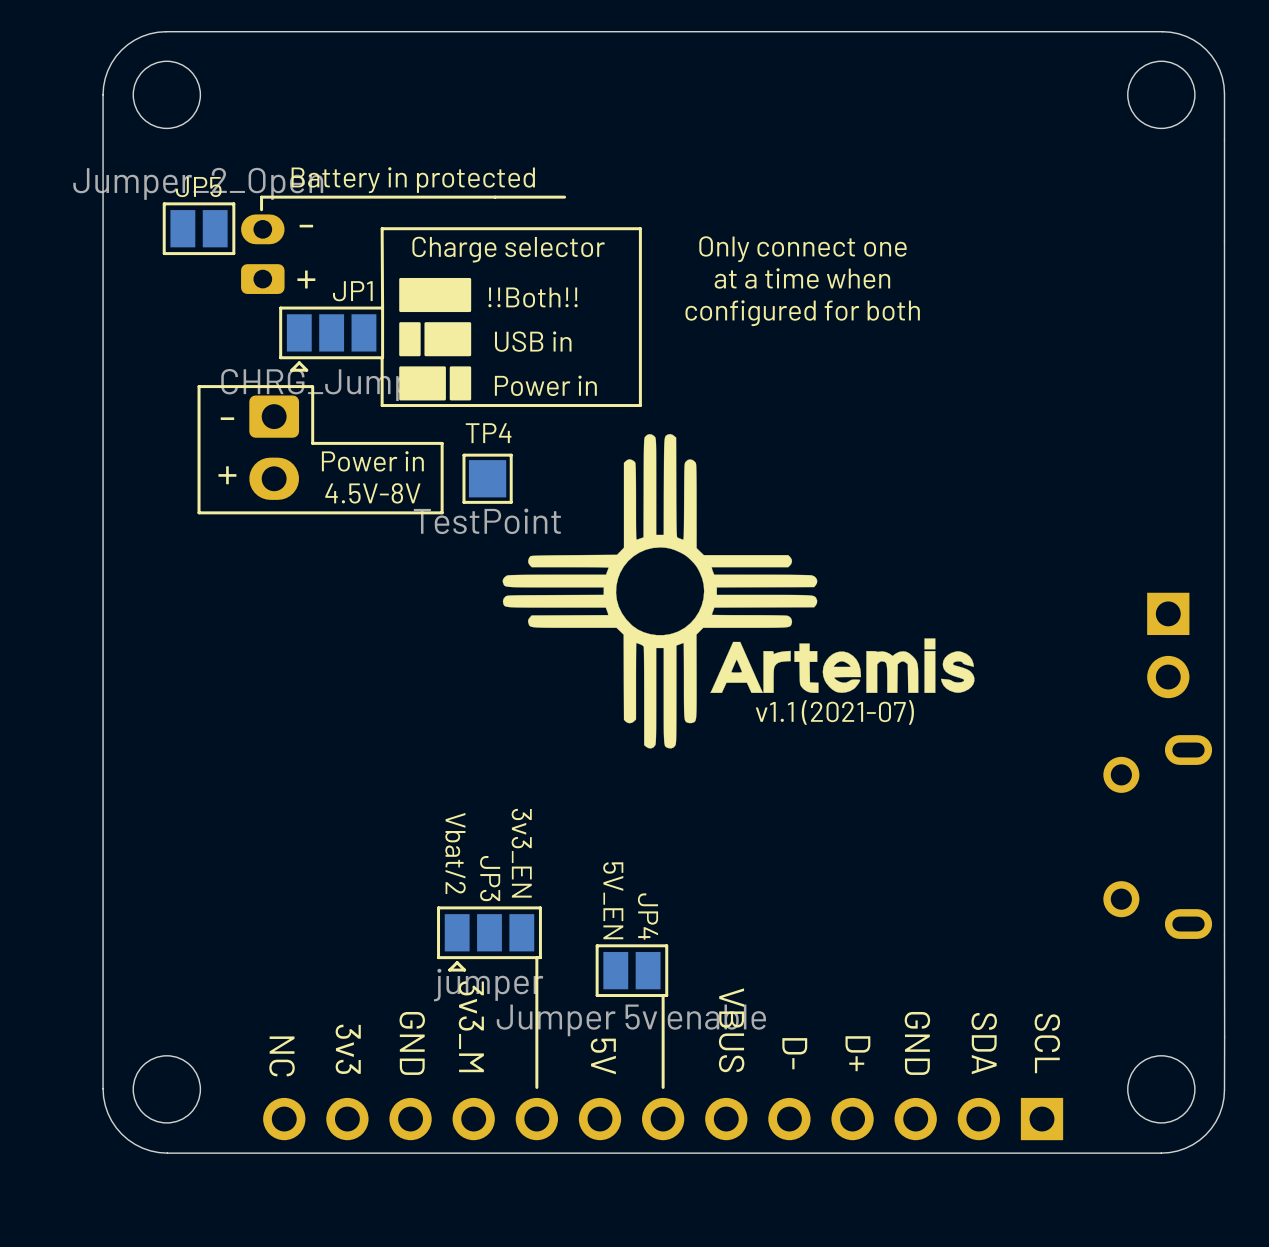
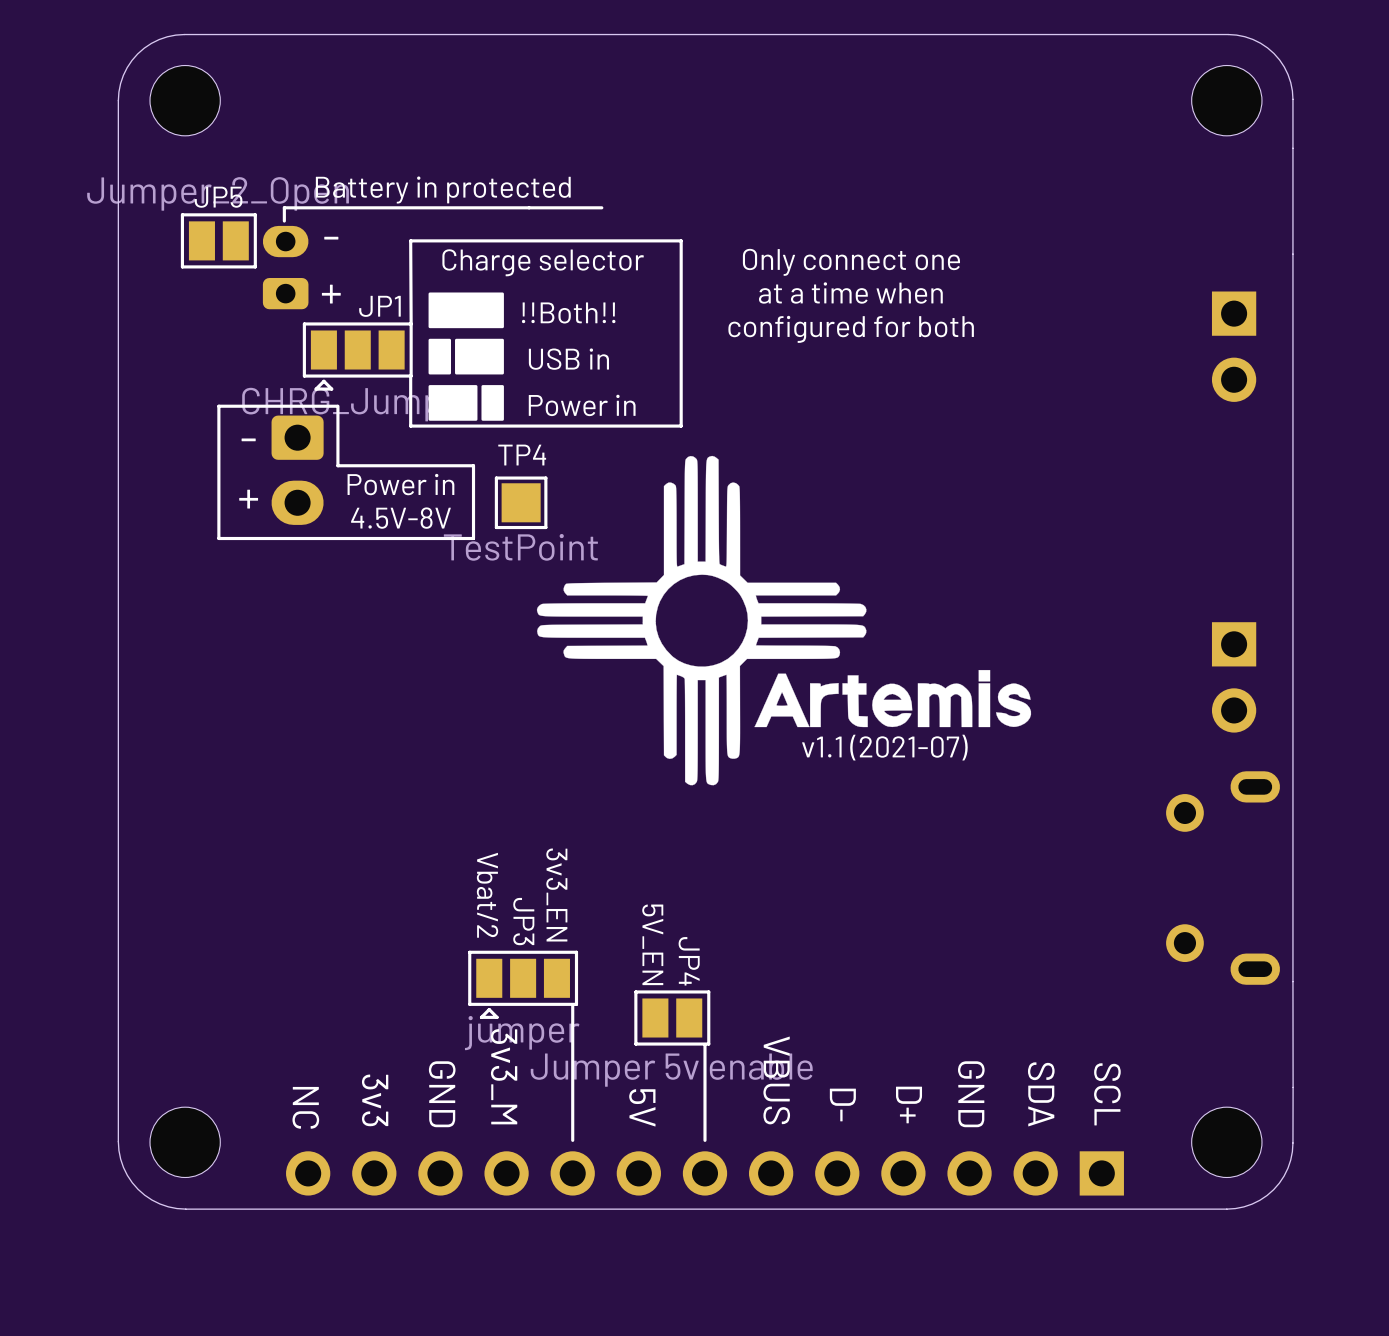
part: none -> (1234, 346)

